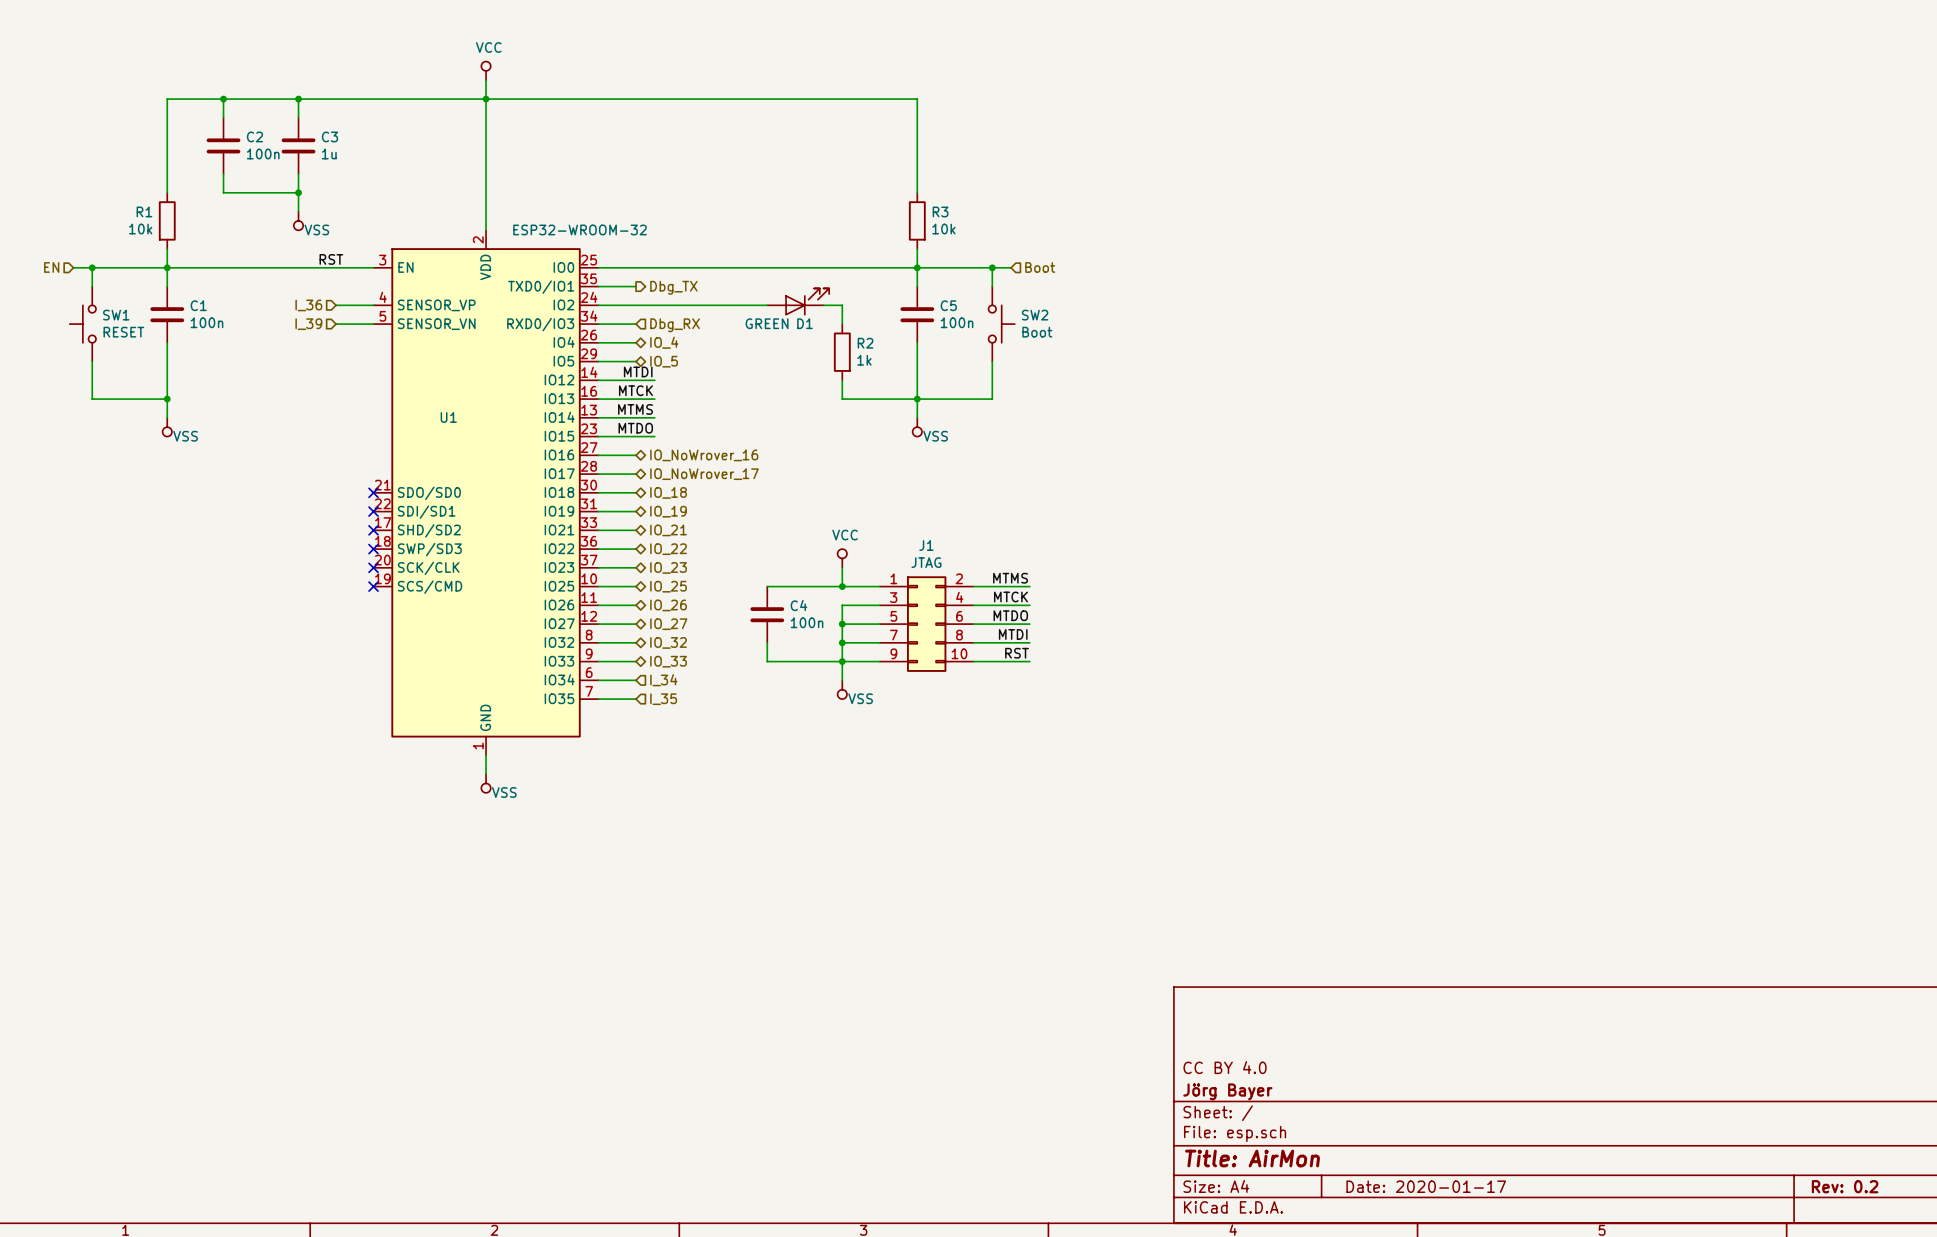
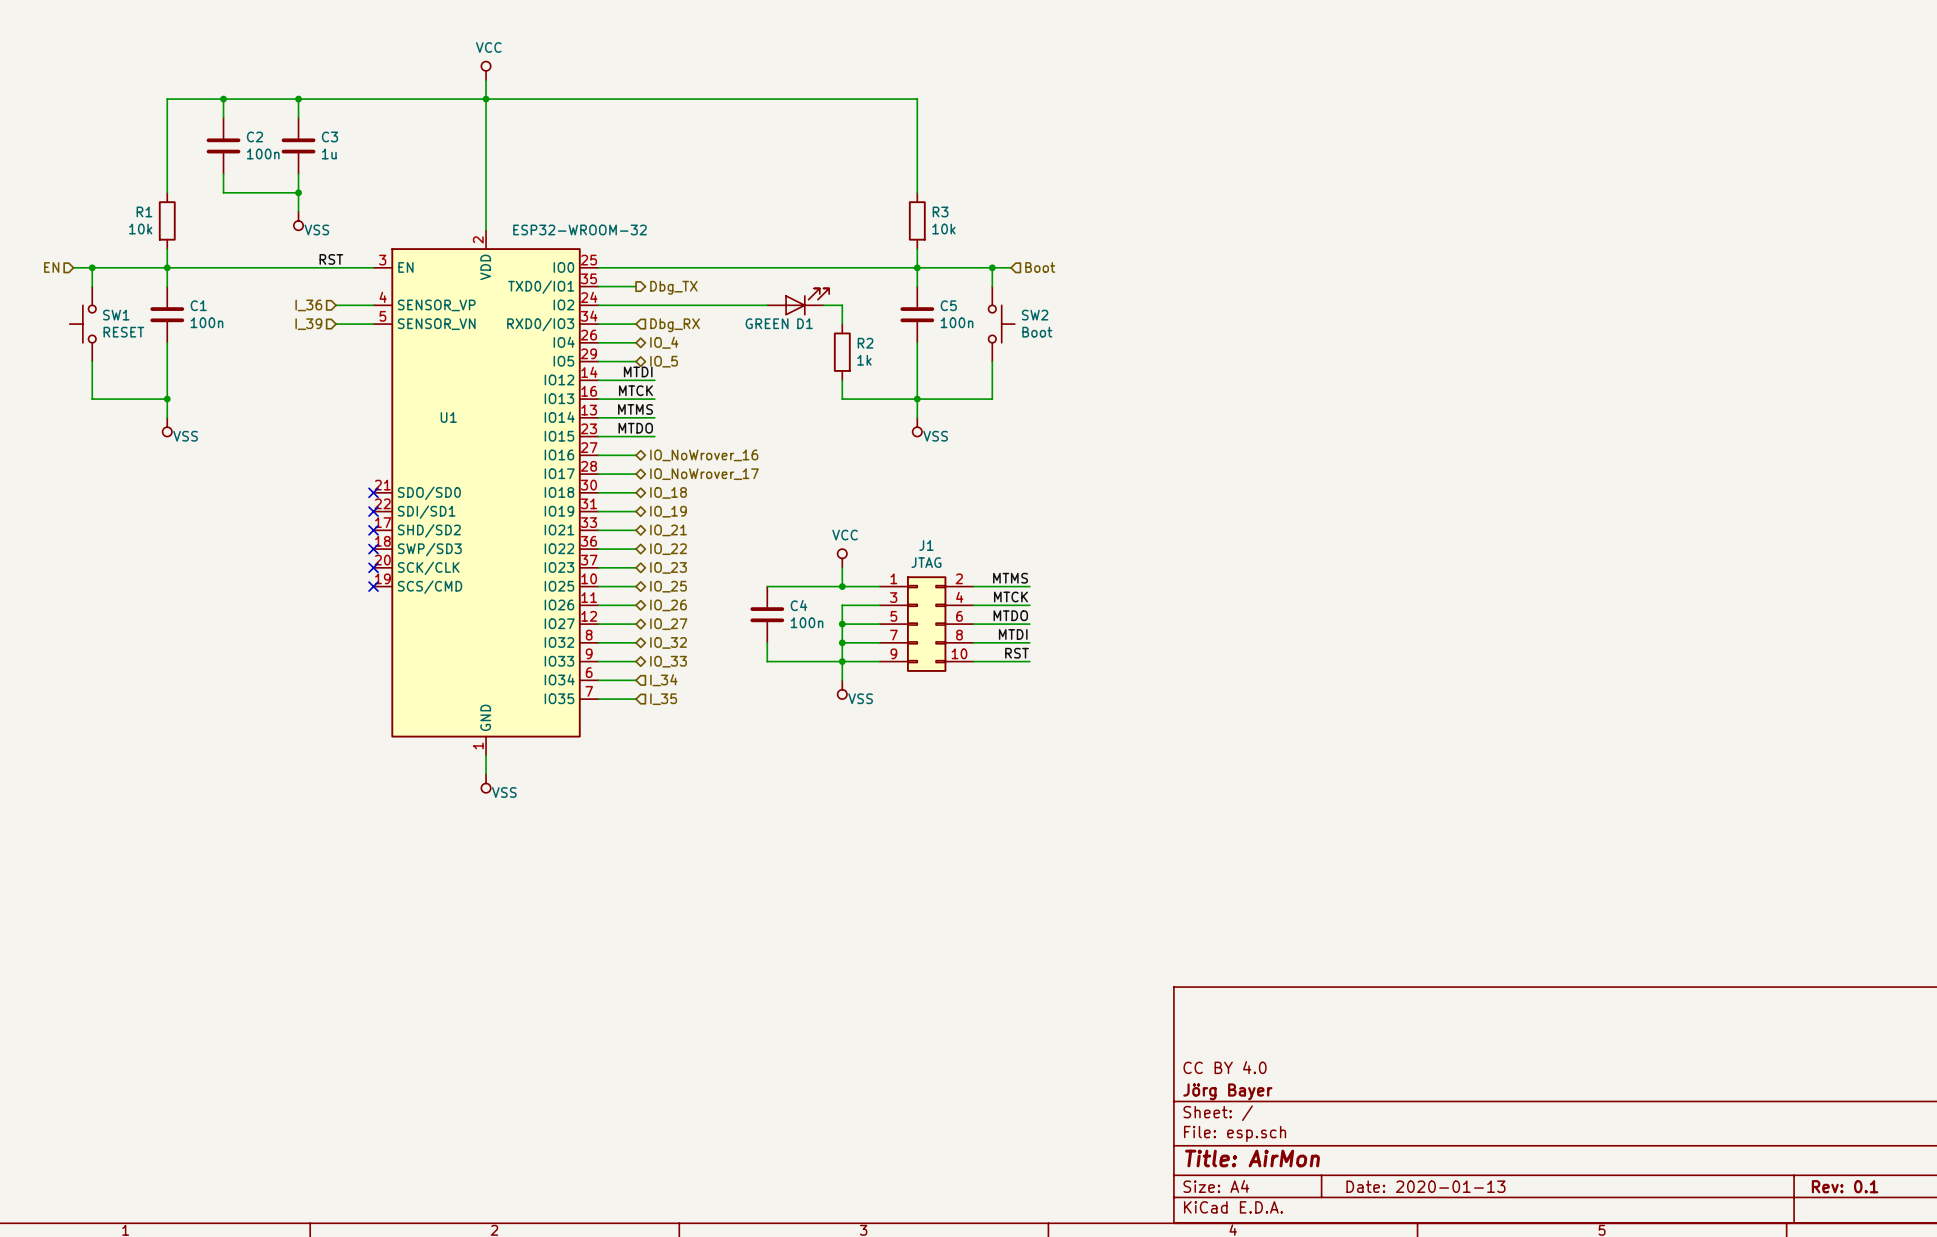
title block: Date: 2020-01-17 (1426, 1186) -> Date: 2020-01-13 (1425, 1186)
title block: Rev: 0.2 (1845, 1186) -> Rev: 0.1 (1845, 1186)

